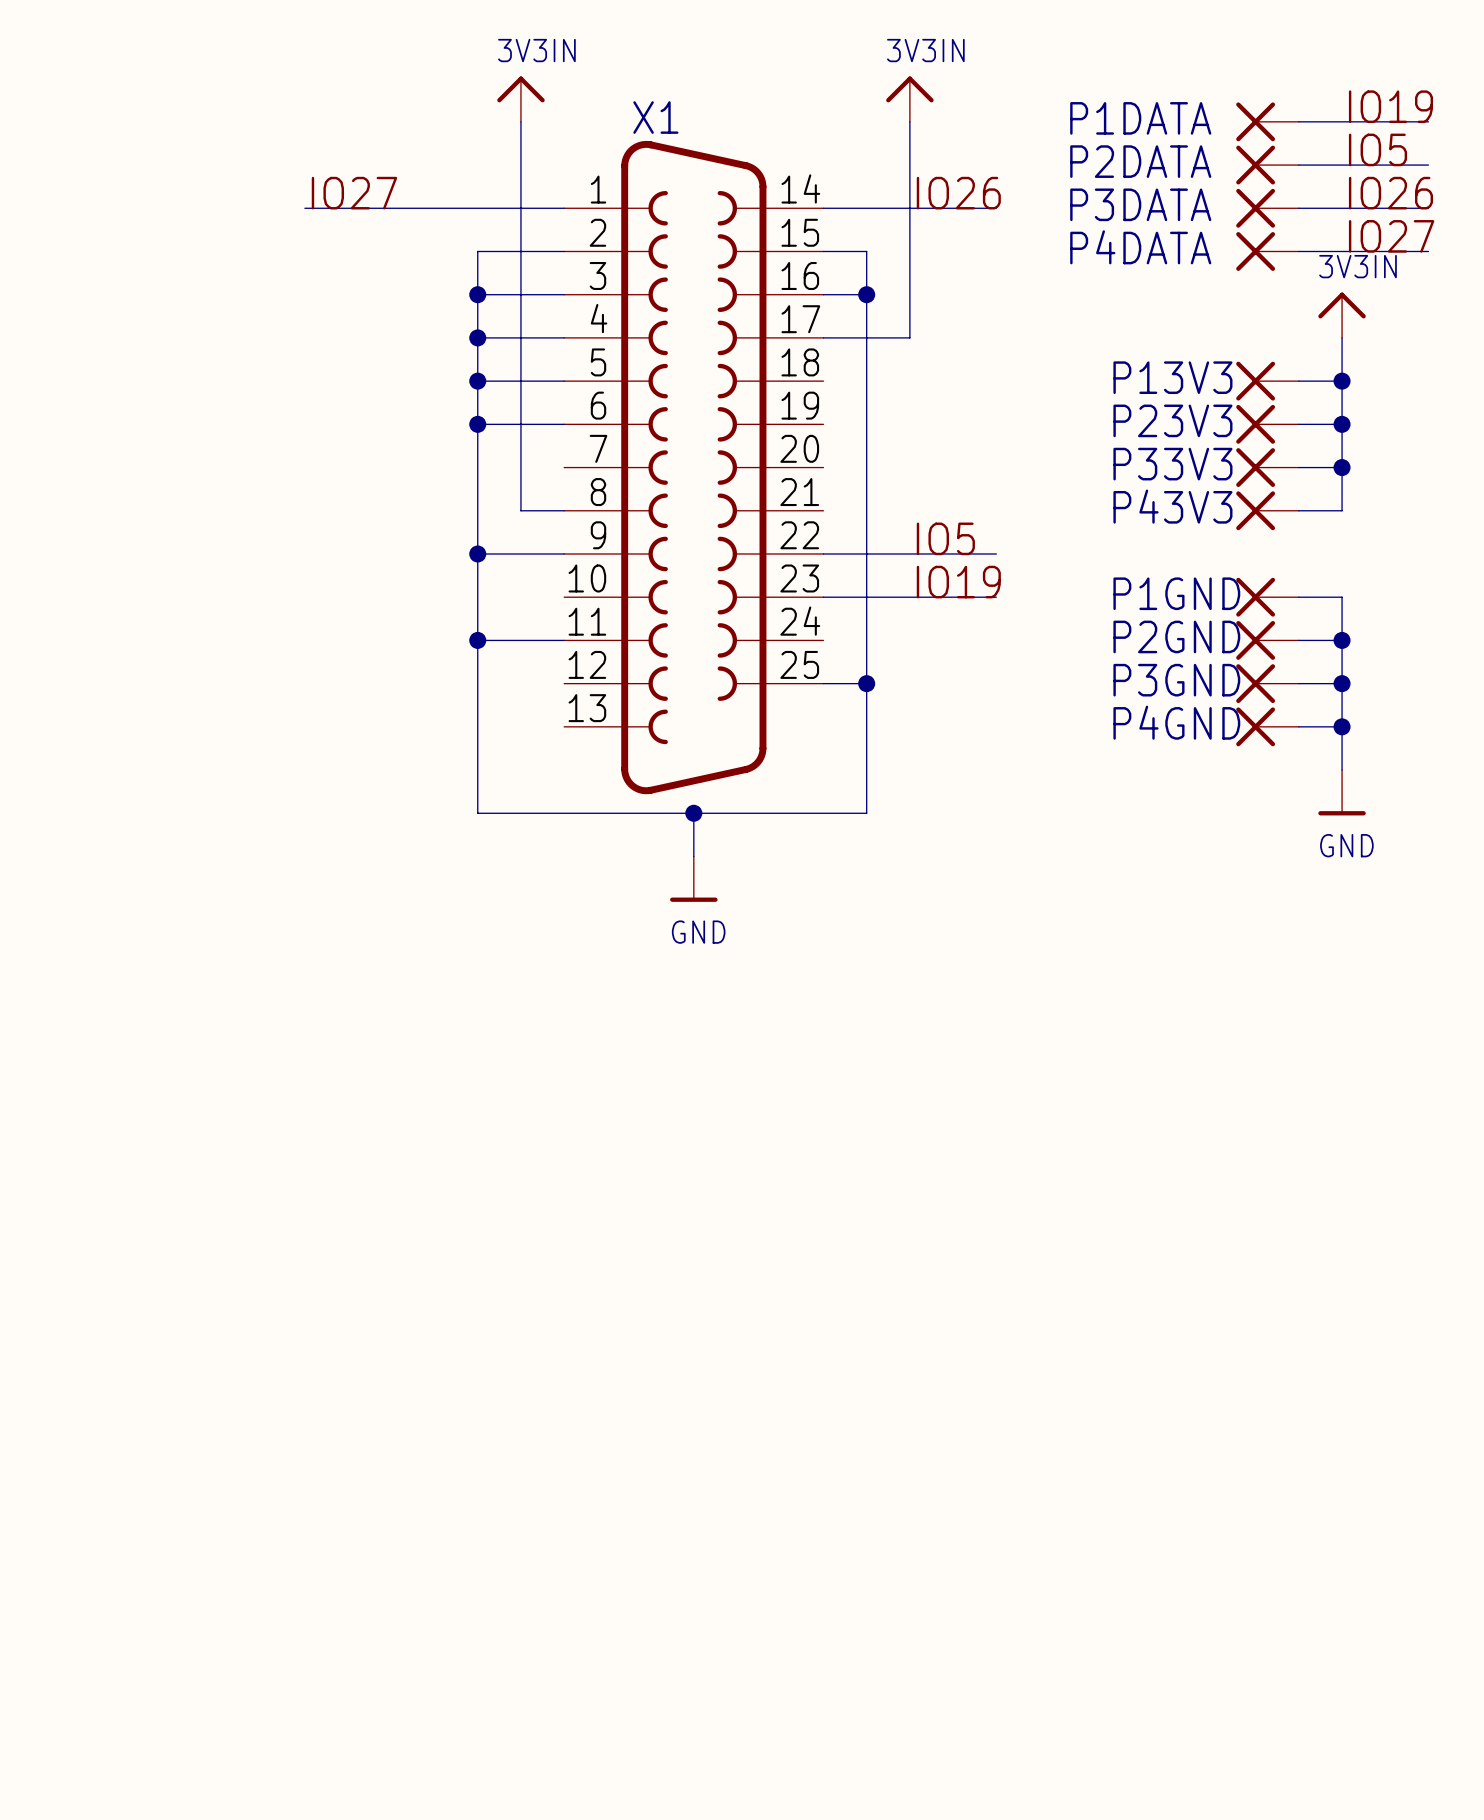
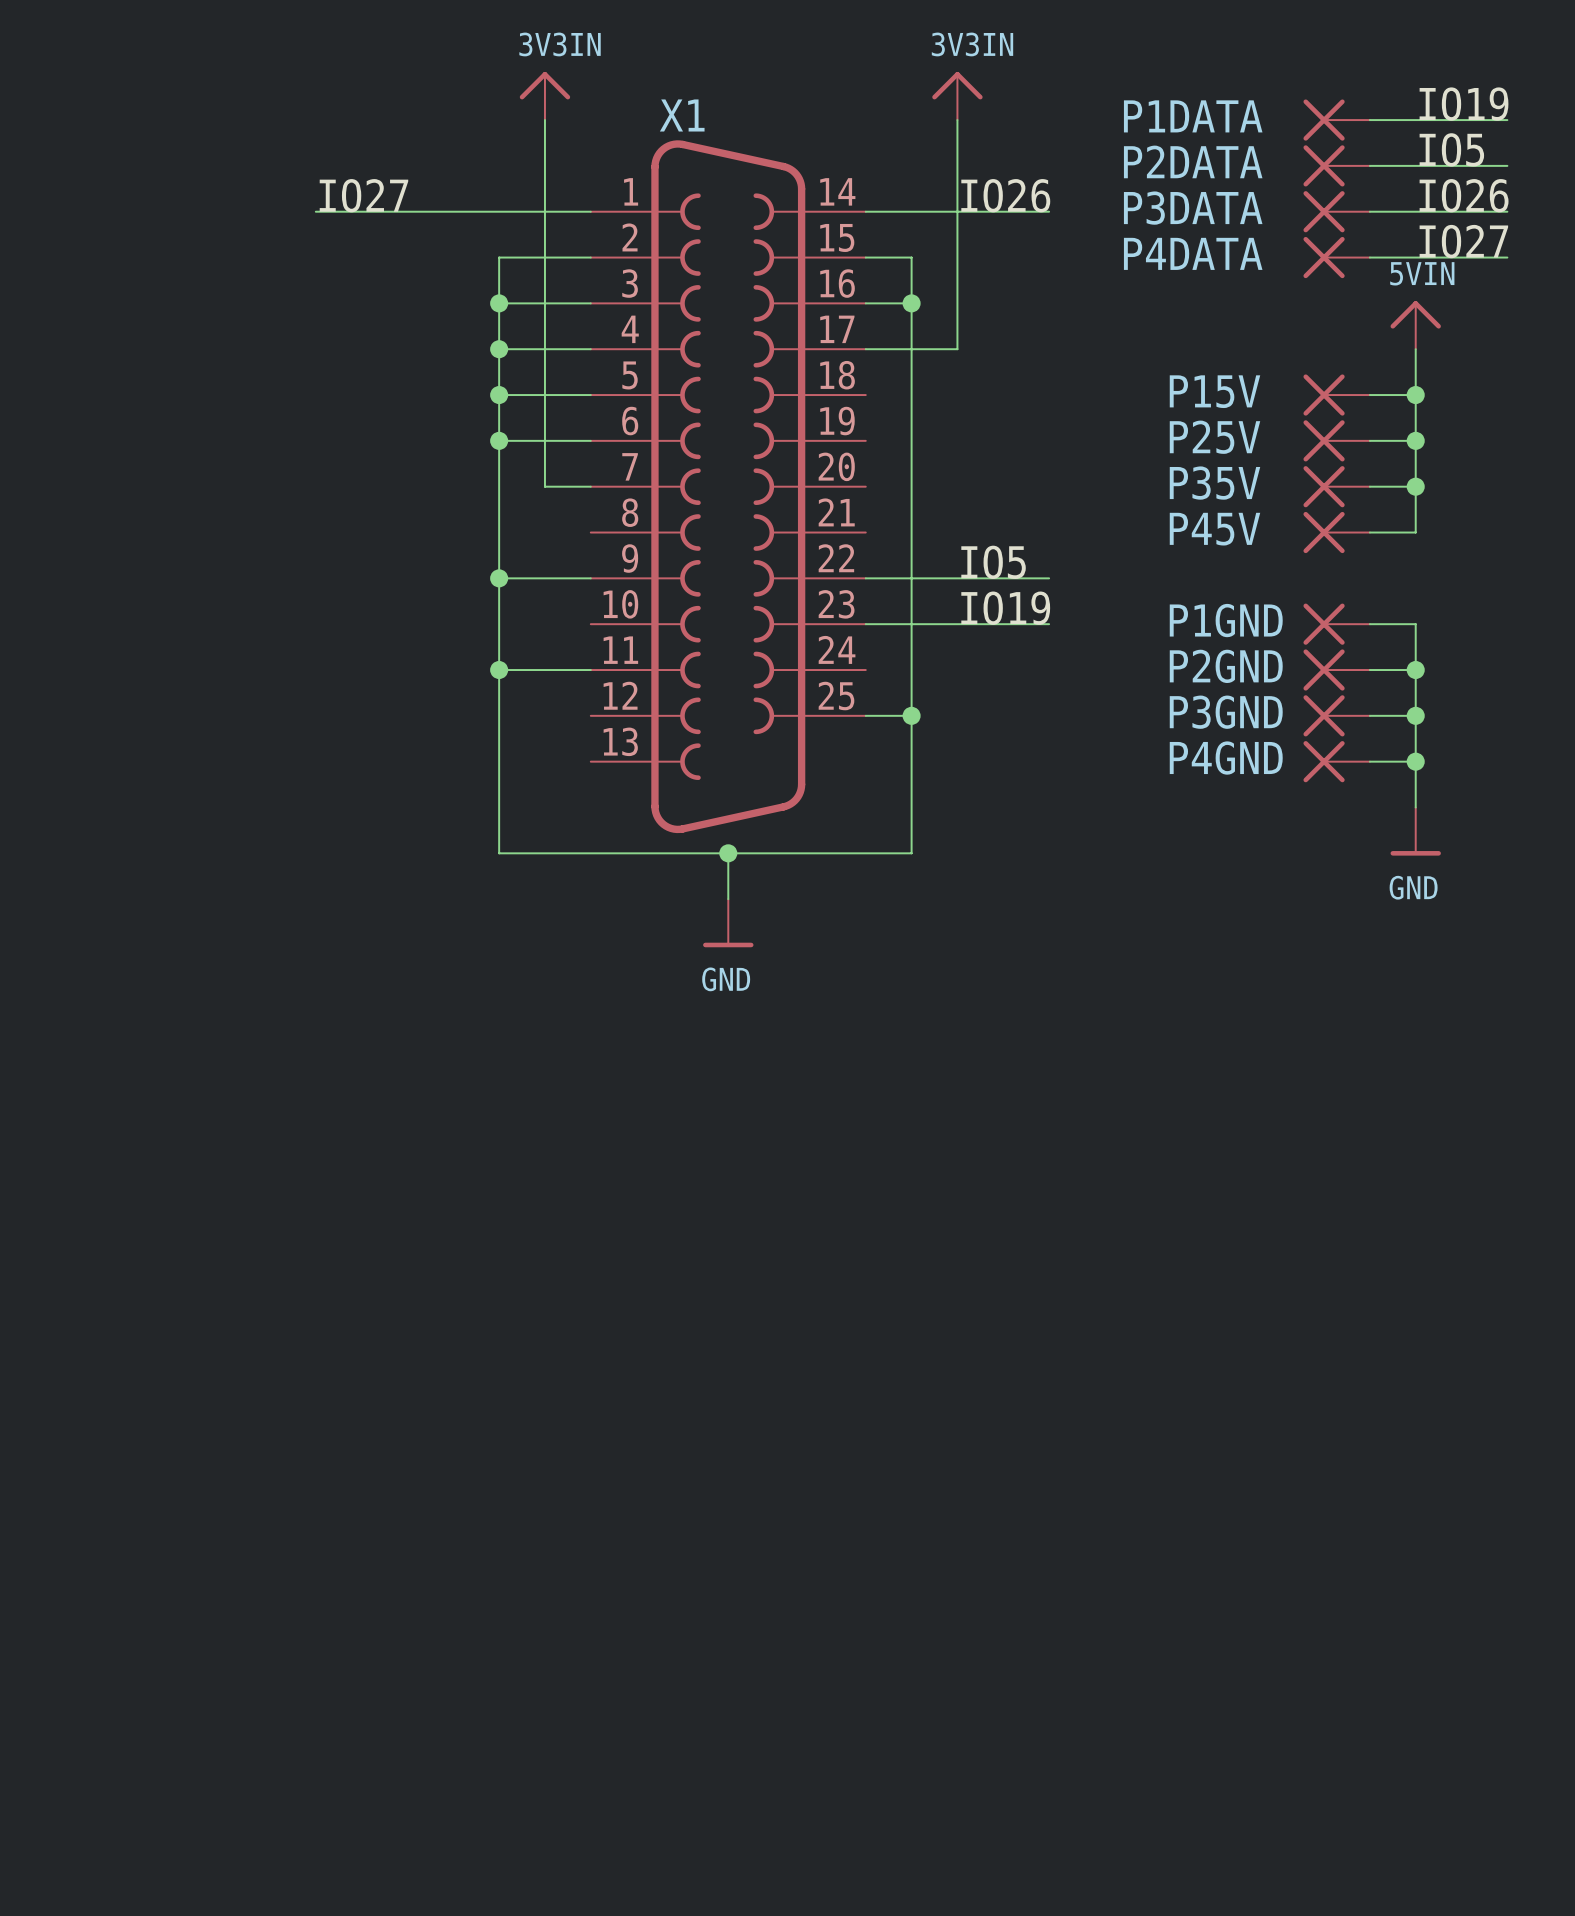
power symbol: 3V3IN (1342, 315) -> 5VIN (1415, 325)
P13V3 name: P13V3 (1172, 377) -> P15V (1214, 391)
P23V3 name: P23V3 (1172, 420) -> P25V (1214, 437)
P33V3 name: P33V3 (1172, 464) -> P35V (1214, 483)
wire: (520, 467) (520, 510) (564, 510) -> (544, 486) (590, 486)
P43V3 name: P43V3 (1172, 506) -> P45V (1214, 529)

